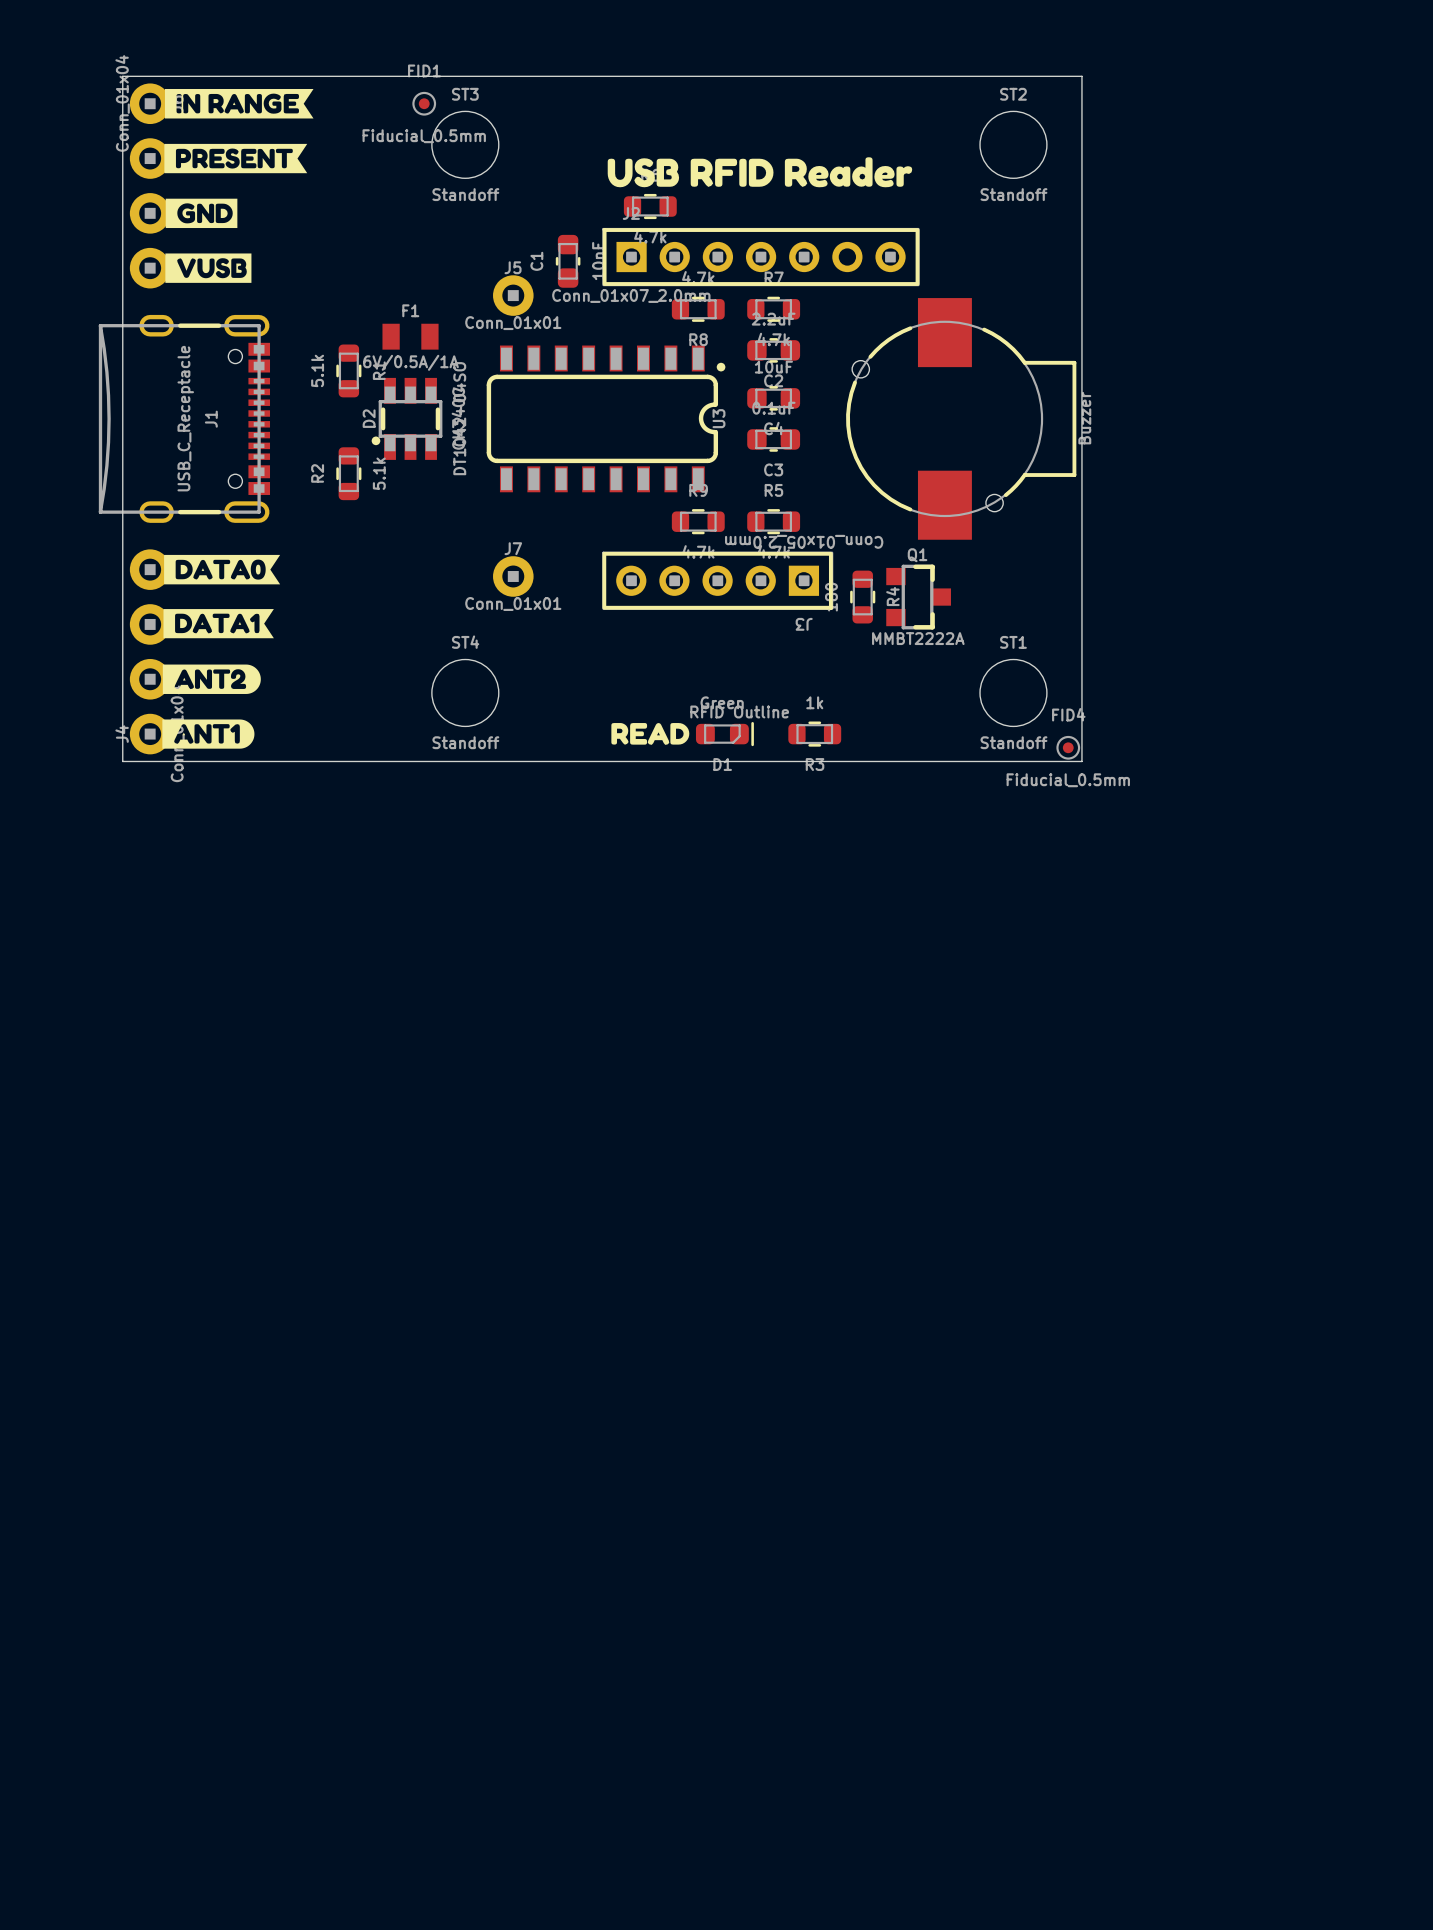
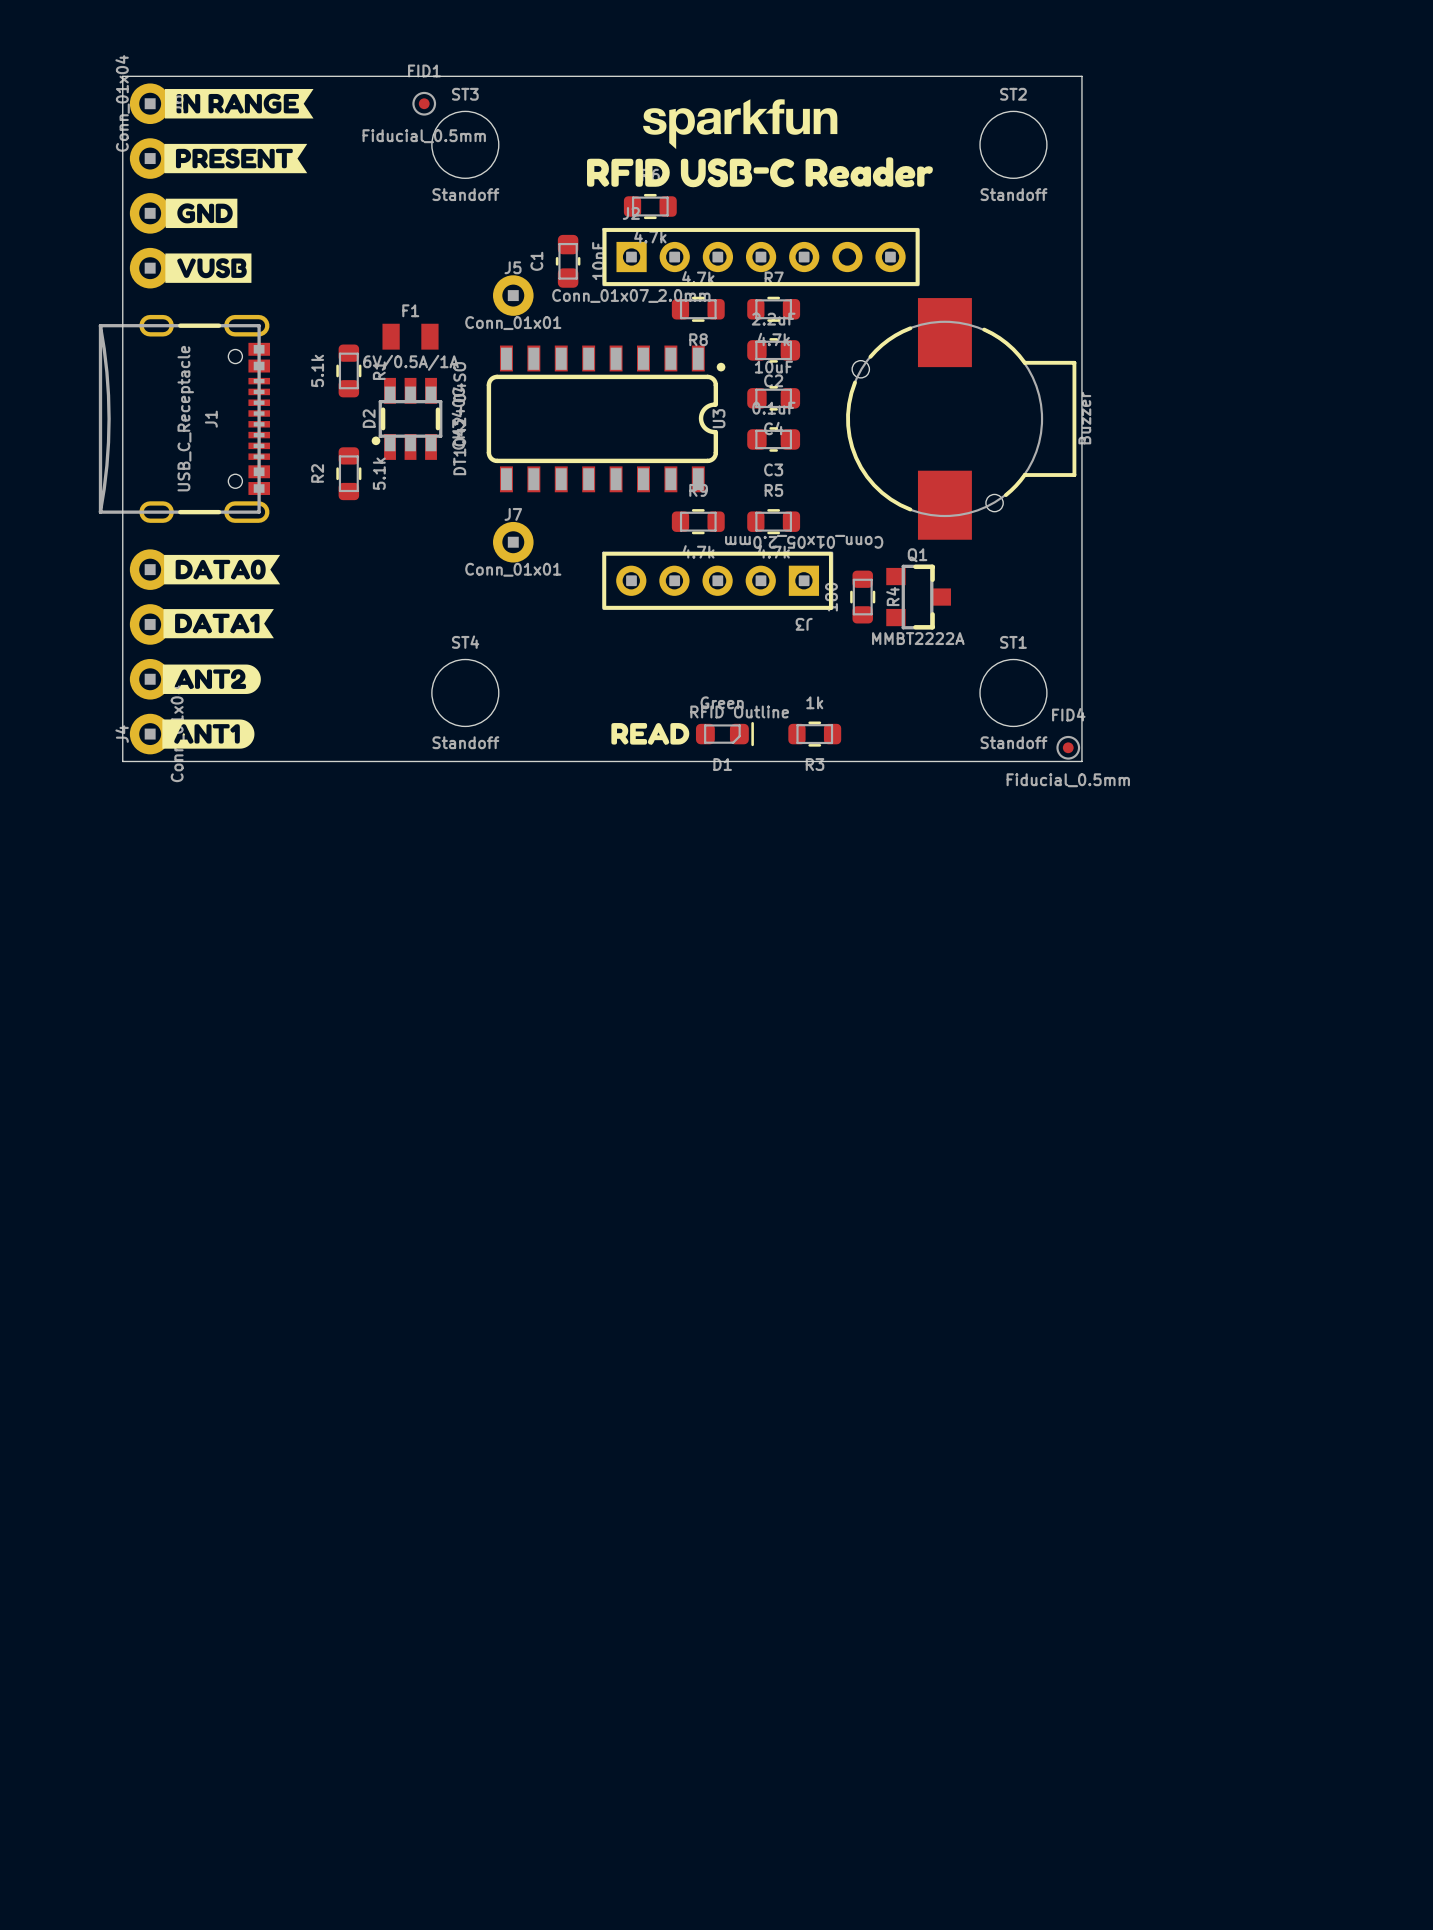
drawing: none -> [643, 99, 838, 150]
drawing shape: [607, 157, 913, 188] -> [587, 157, 933, 188]
J7 position: (513, 576) -> (513, 542)

